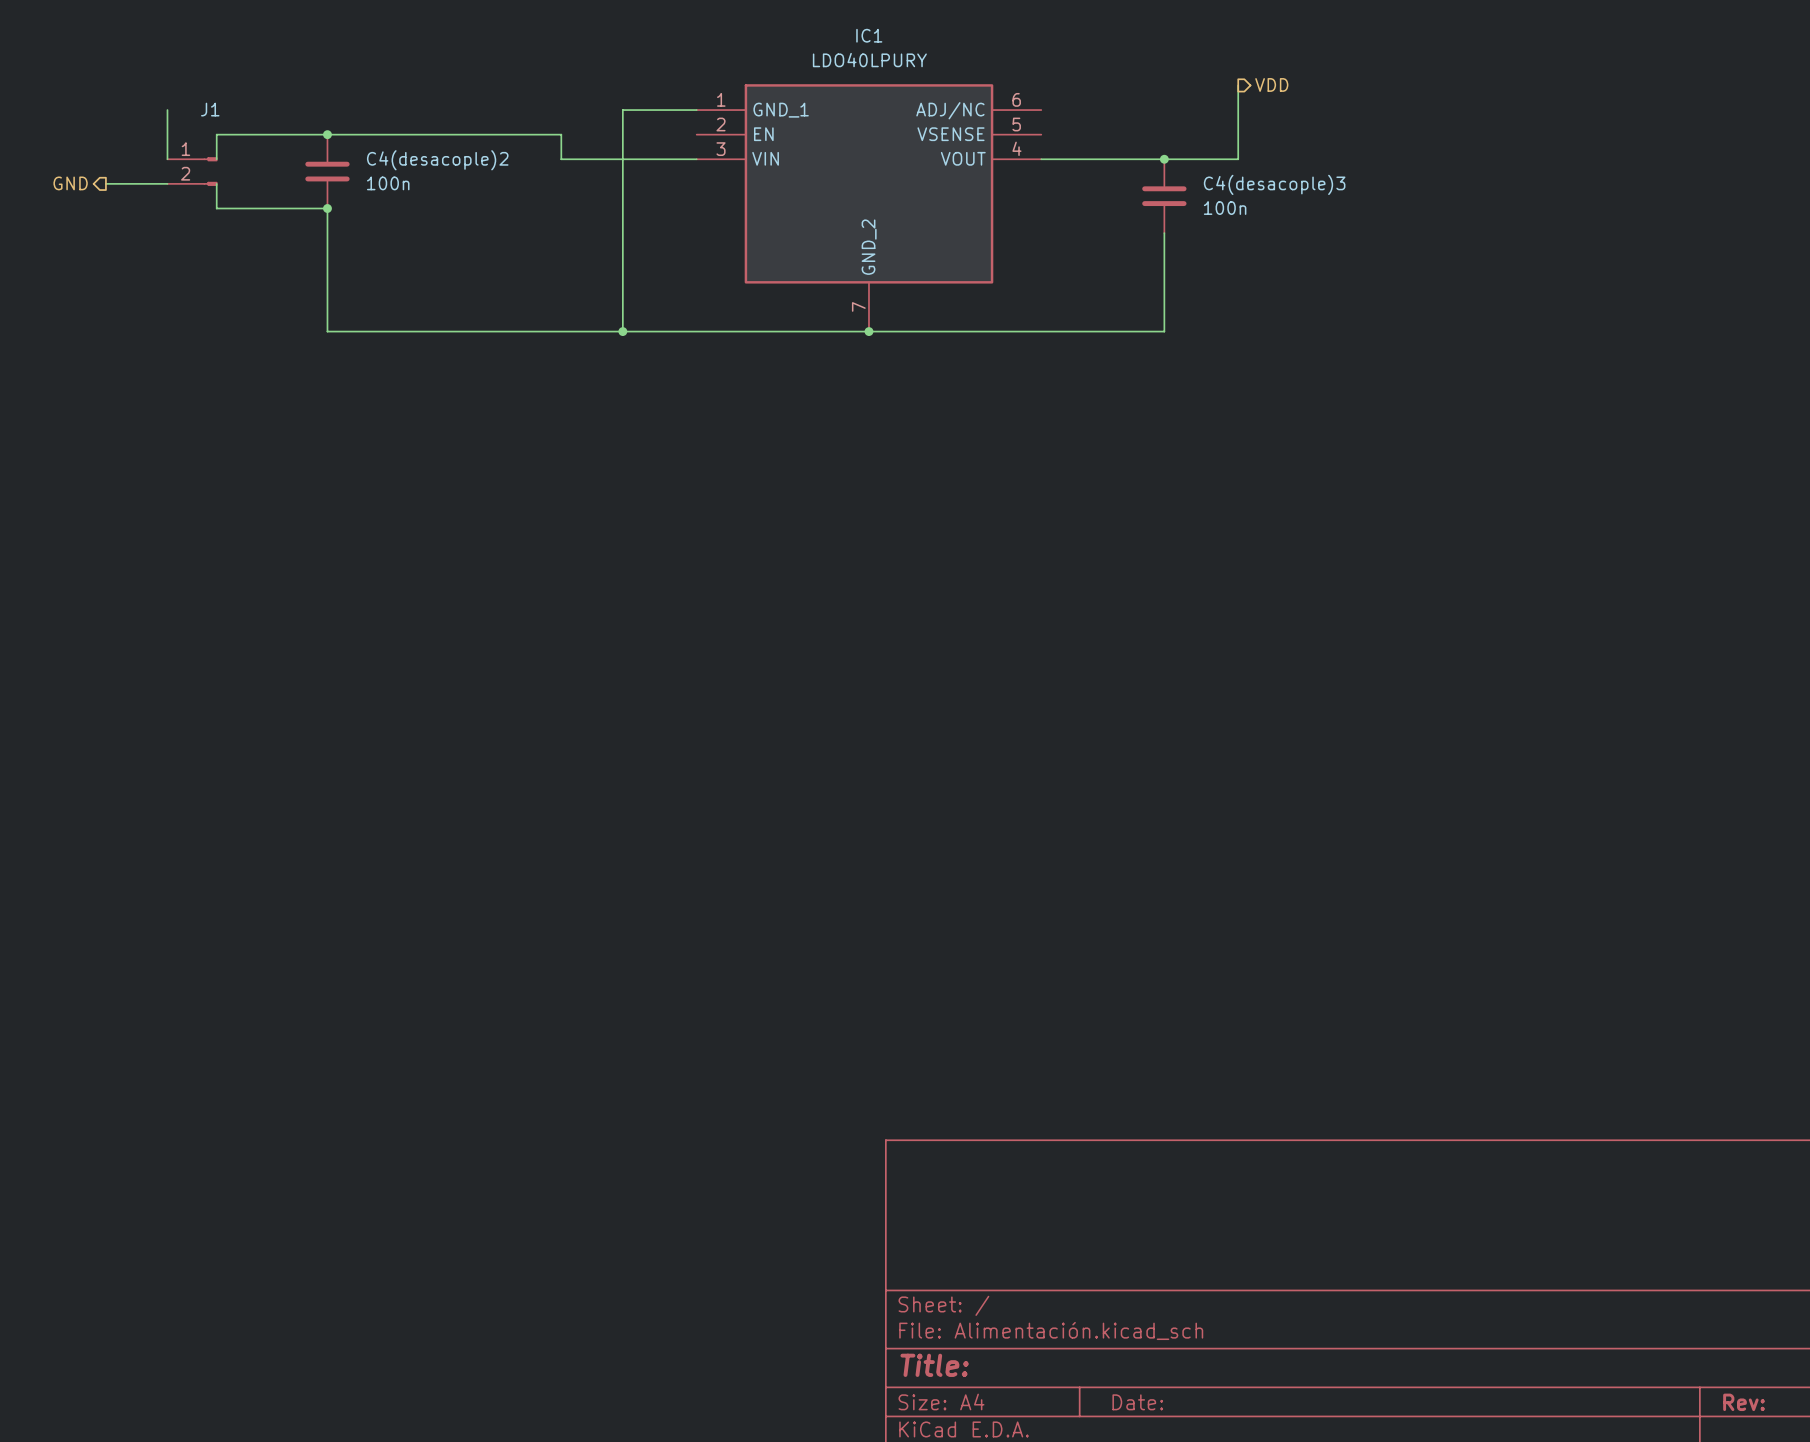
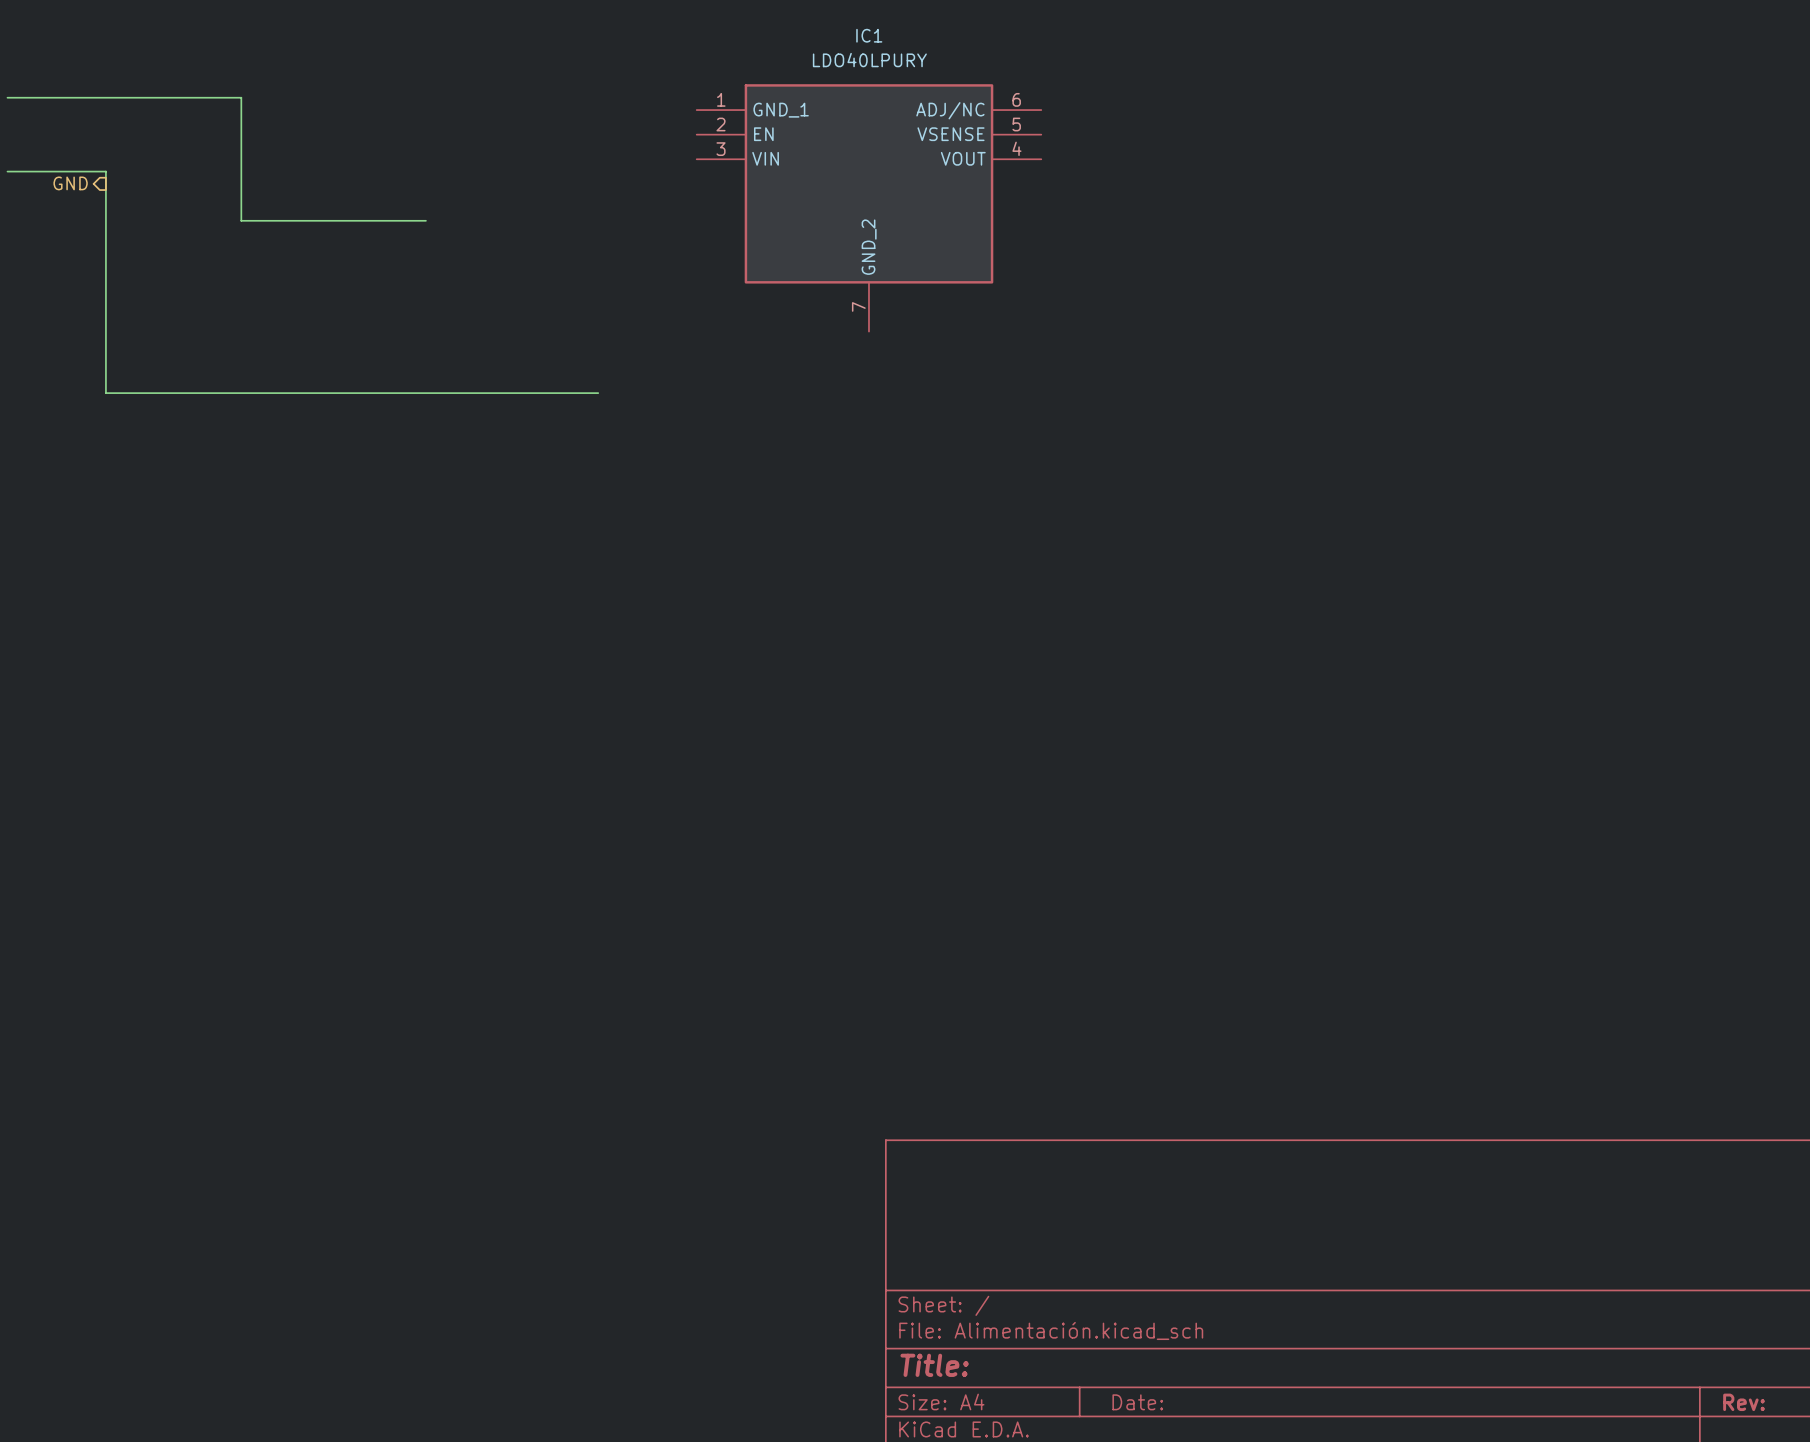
hierarchical label: VDD (1271, 84) -> none
wire: (1238, 85) (1238, 159) (1041, 159) -> none
wire: none -> (7, 97) (241, 97) (241, 220) (425, 220)
wire: (167, 110) (167, 159) -> none
wire: (696, 110) (622, 110) (622, 331) -> none
junction: (327, 134) -> none
wire: (216, 159) (216, 134) (561, 134) (561, 159) (696, 159) -> none
junction: (1164, 159) -> none
wire: none -> (7, 171) (105, 171) (105, 393) (598, 393)
J1: (192, 171) -> none
C4(desacople)2: 100n (327, 171) -> none
wire: (105, 183) (167, 183) -> none
wire: (216, 183) (216, 208) (327, 208) (327, 331) (1164, 331) (1164, 233) -> none
C4(desacople)3: 100n (1164, 196) -> none
junction: (327, 208) -> none
junction: (622, 331) -> none
junction: (868, 331) -> none

